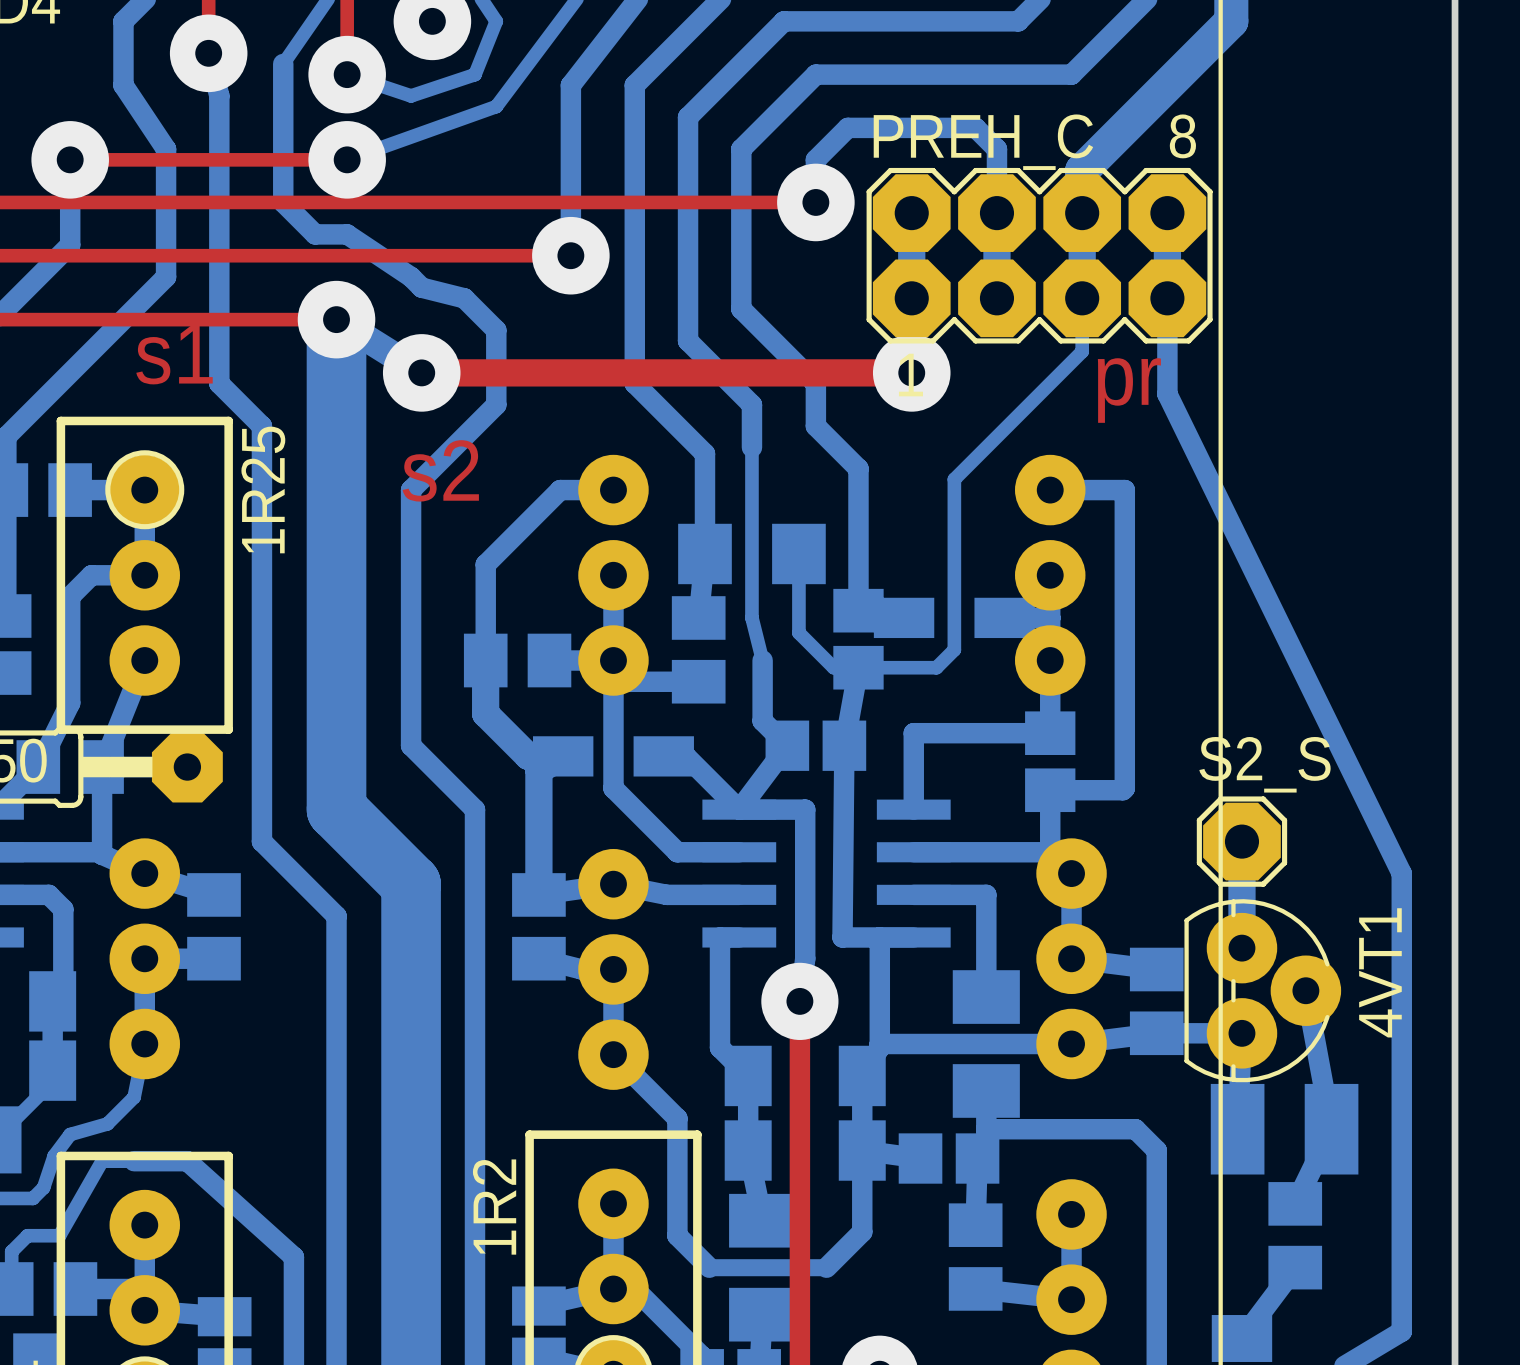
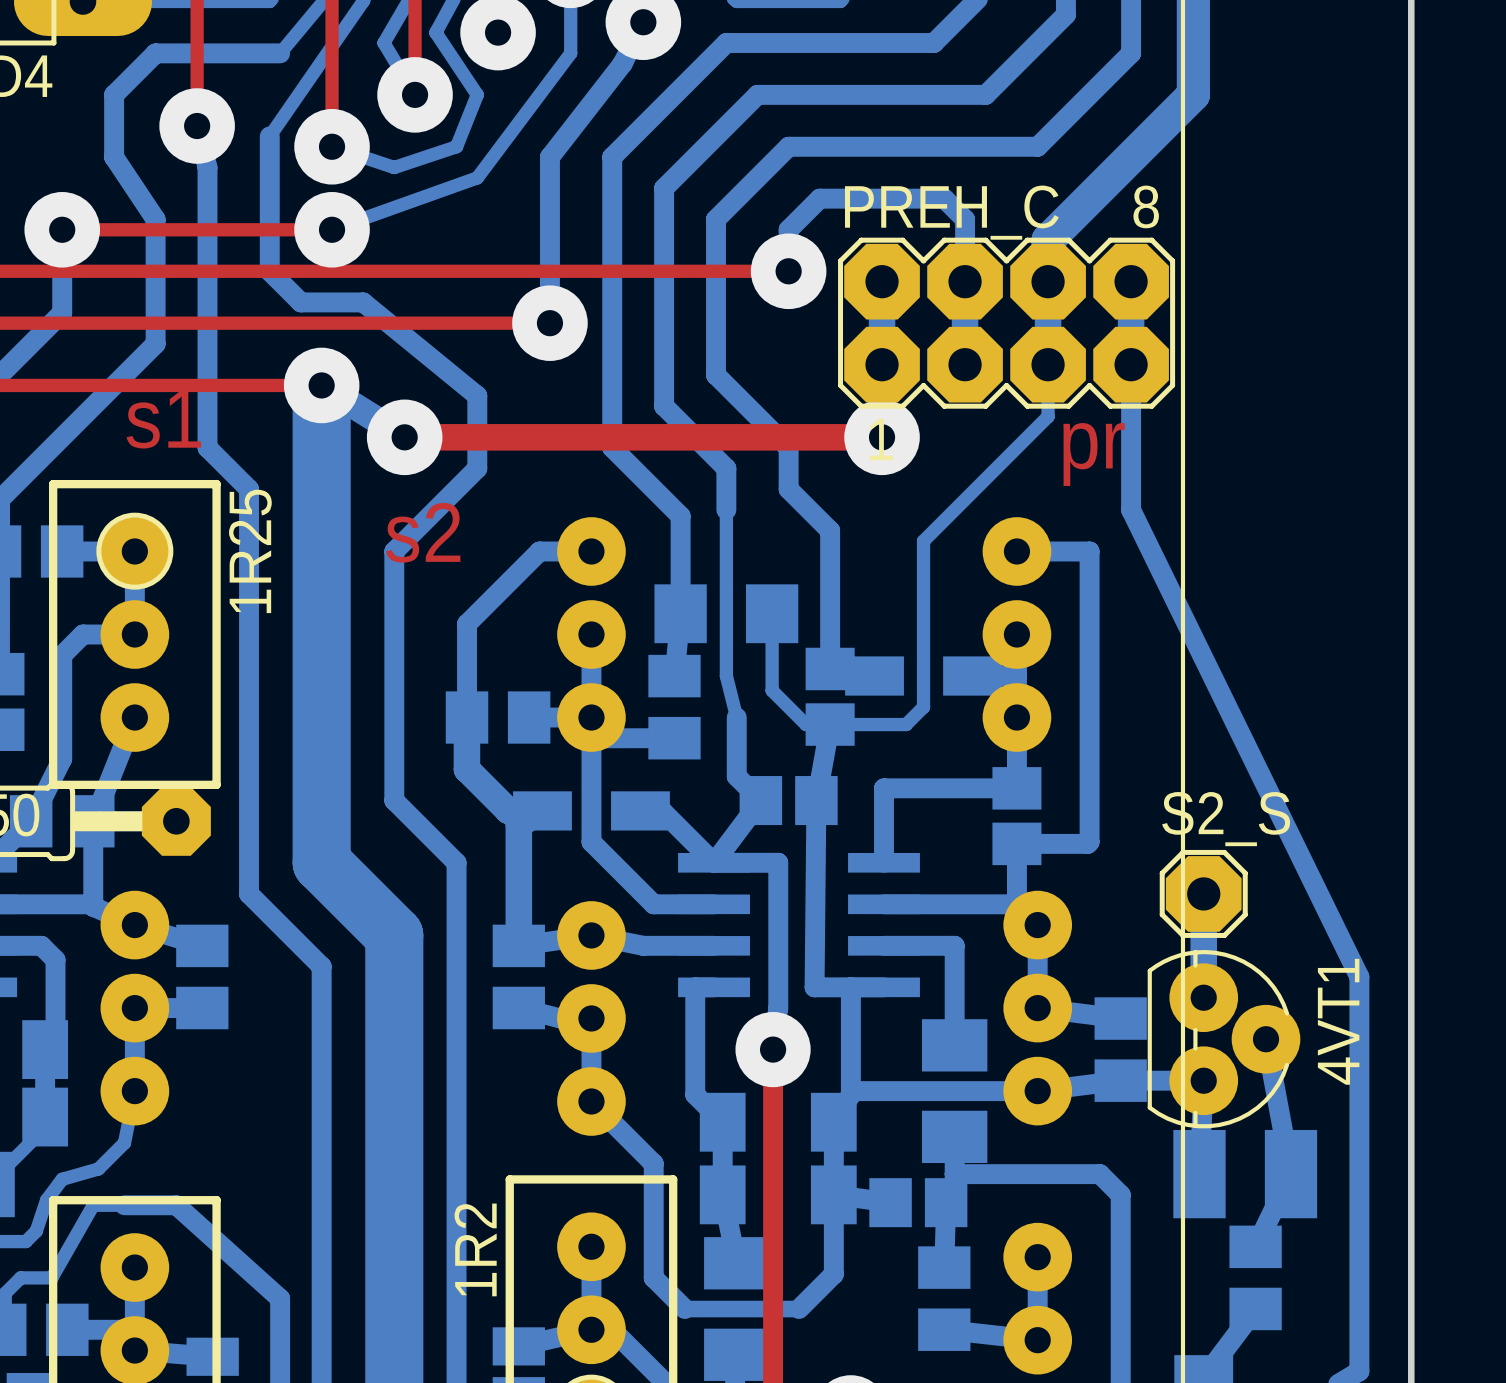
bottom track: (347, 234) (411, 277) (421, 287) (464, 298) (496, 330) -> (332, 302) (363, 302) (477, 395)
bottom track: (1167, 394) (1401, 873) (1401, 926) -> (1131, 458) (1131, 509) (1359, 976)

